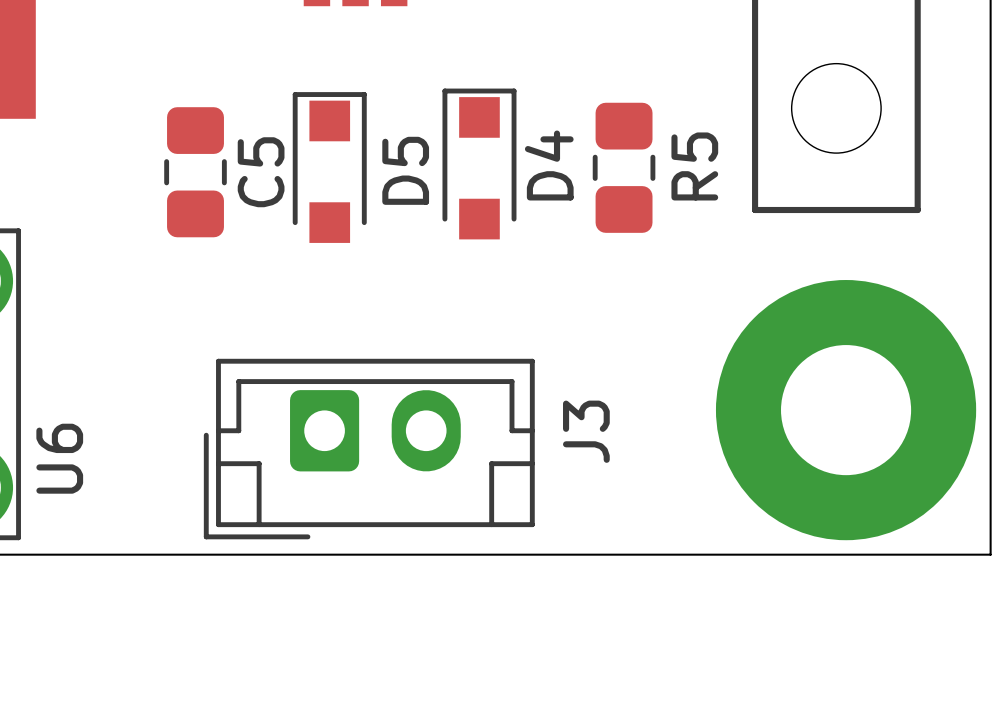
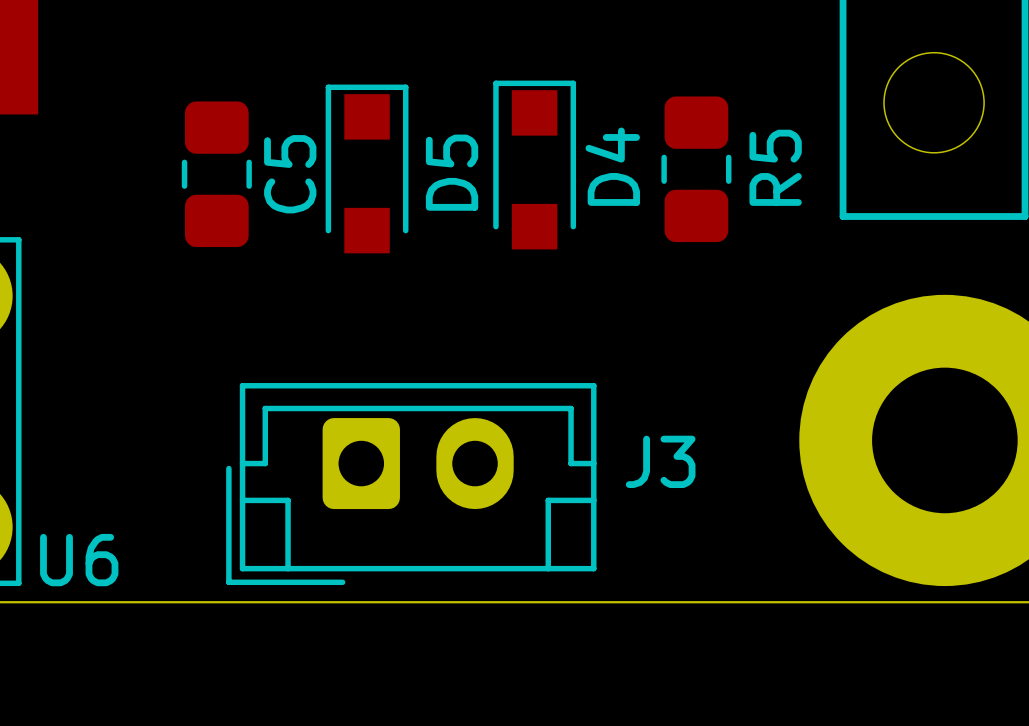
J3 name rotation: 0° (586, 431) -> 90° clockwise (660, 461)
U6 name rotation: 0° (59, 458) -> 90° clockwise (79, 560)

